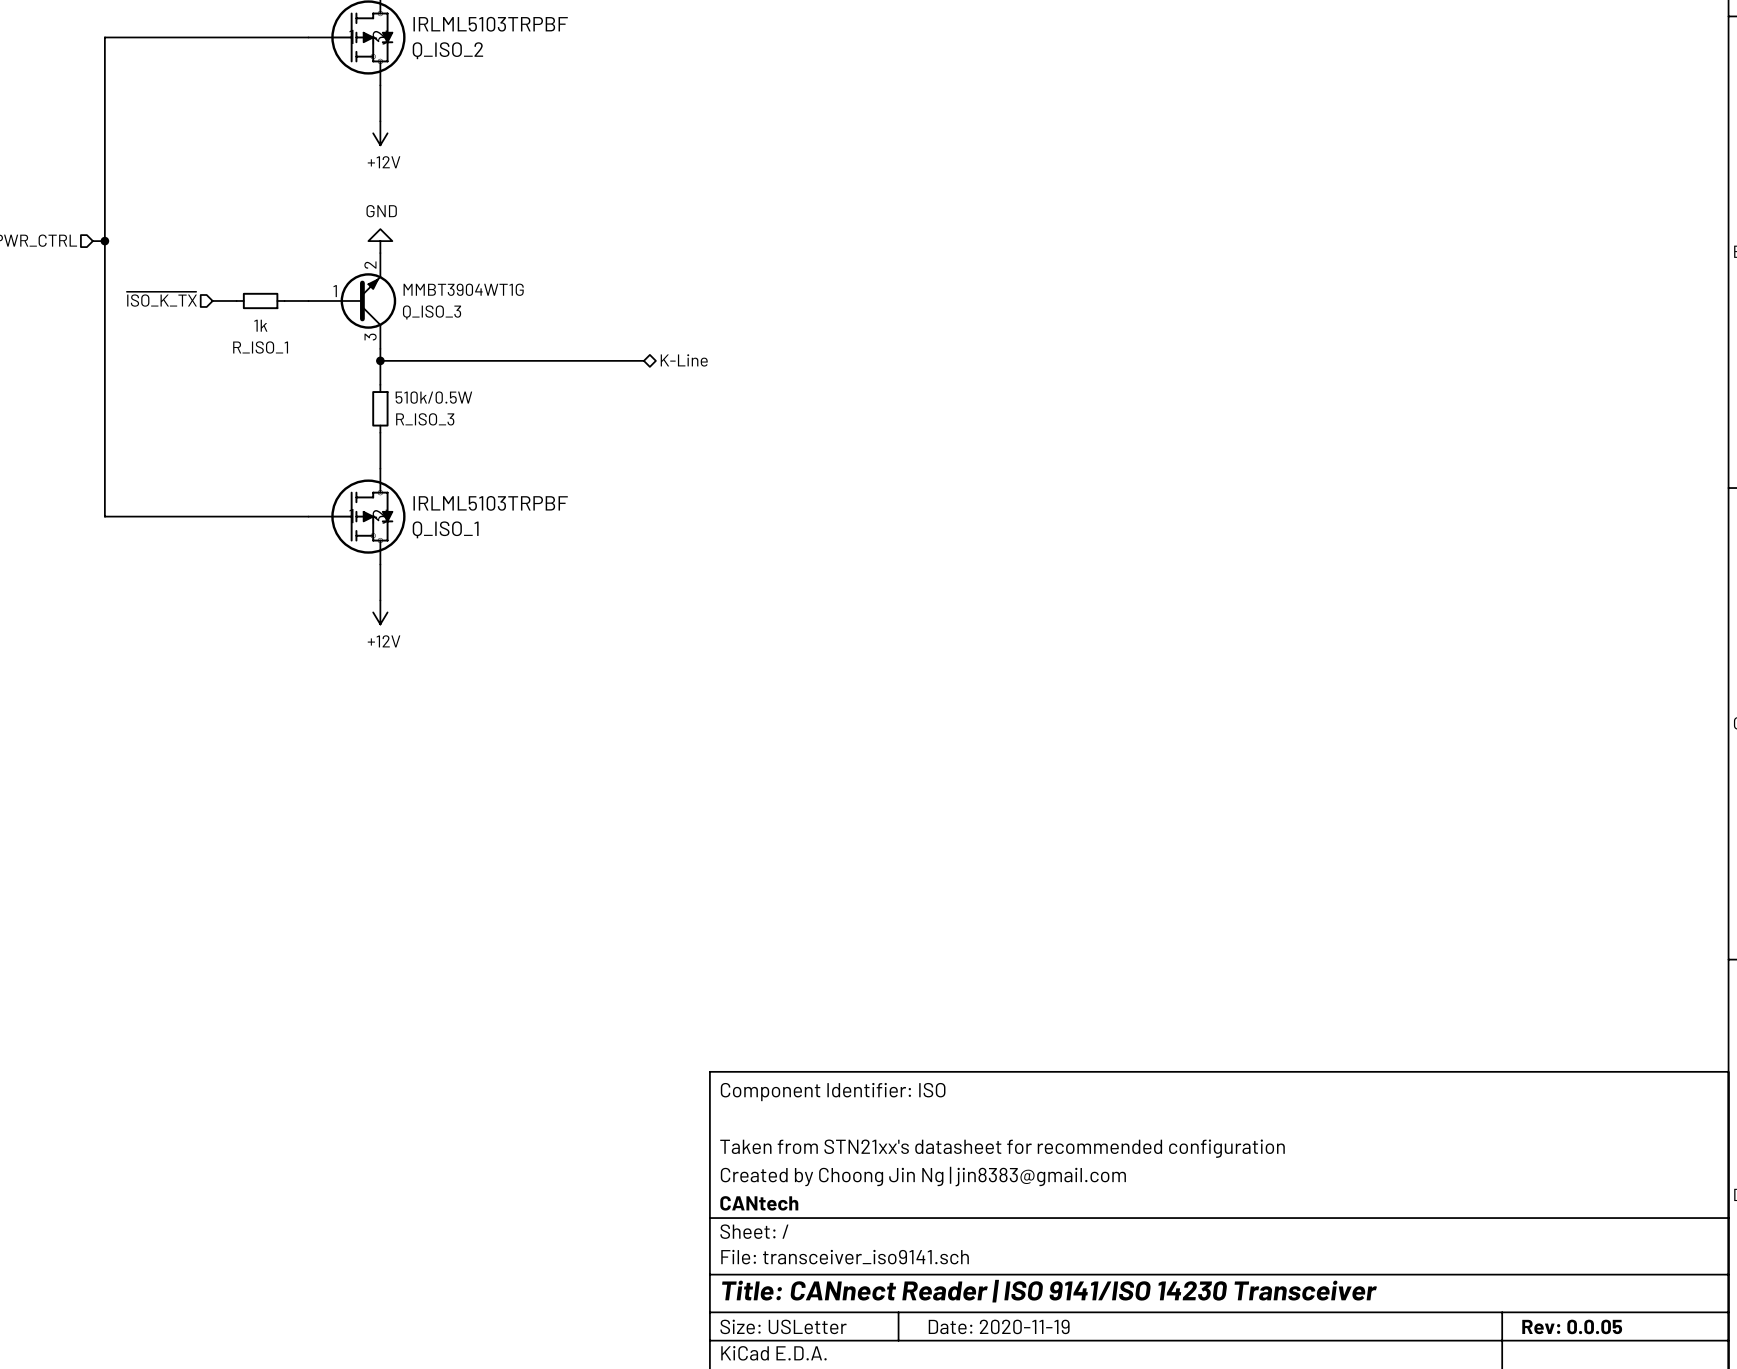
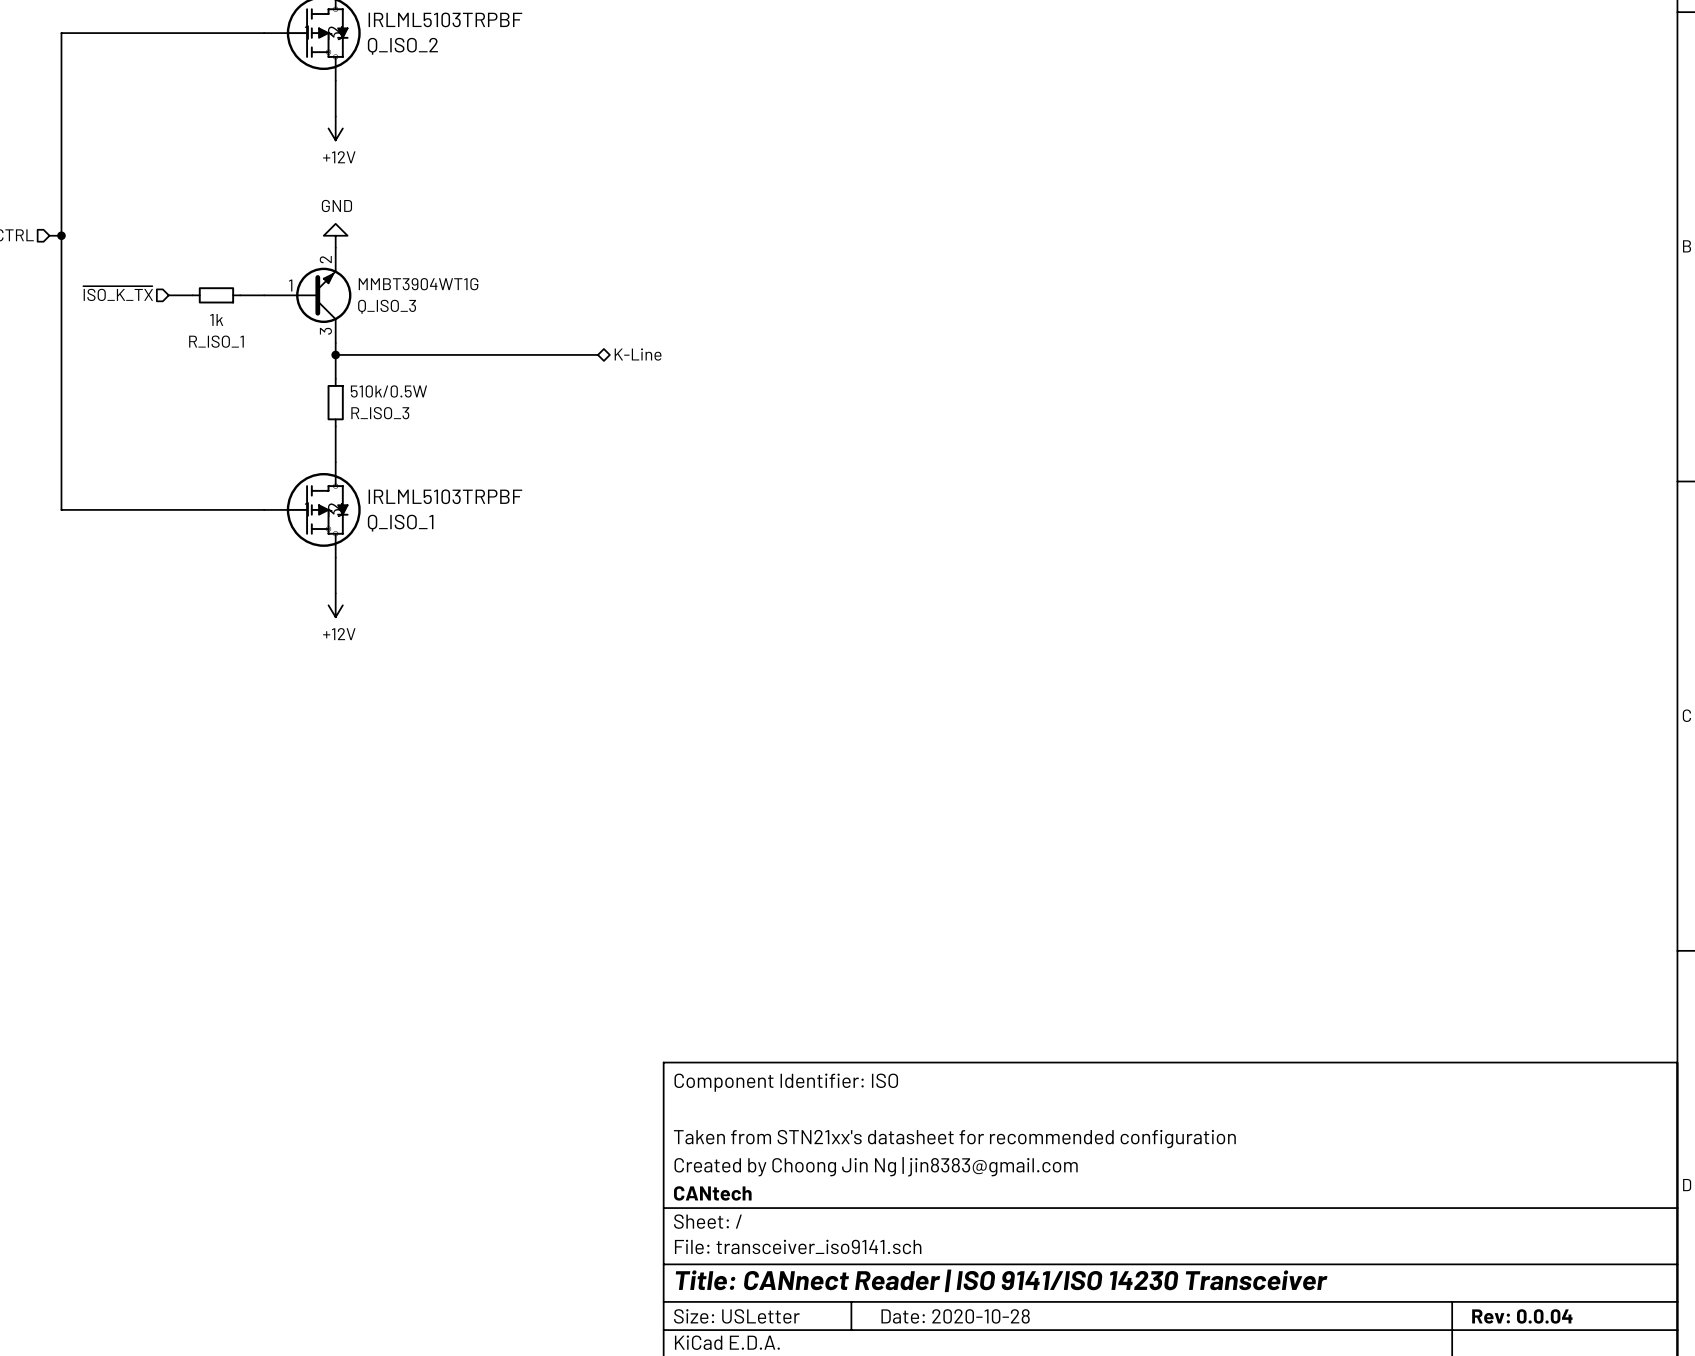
title block: Date: 2020-11-19 (999, 1326) -> Date: 2020-10-28 (955, 1316)
title block: Rev: 0.0.05 (1572, 1326) -> Rev: 0.0.04 (1522, 1316)

